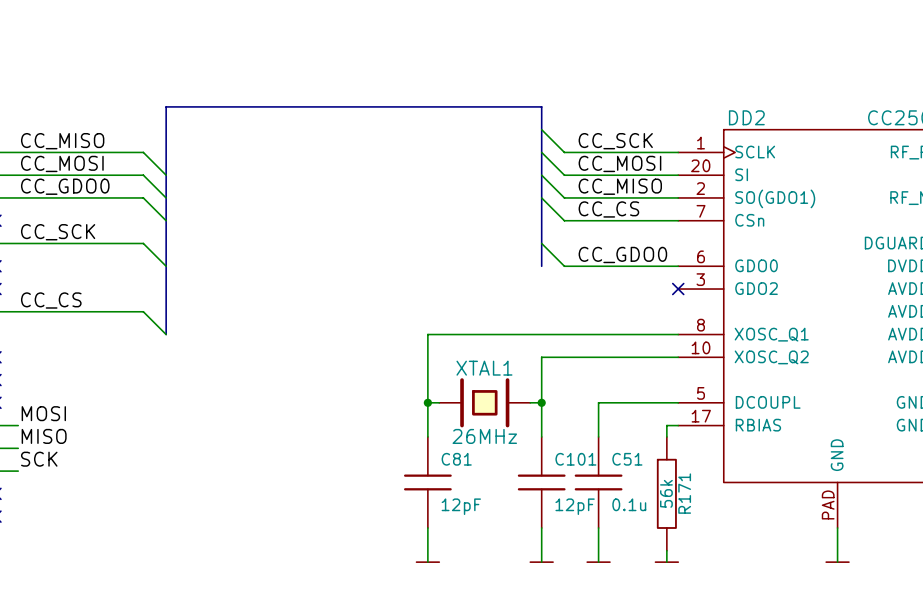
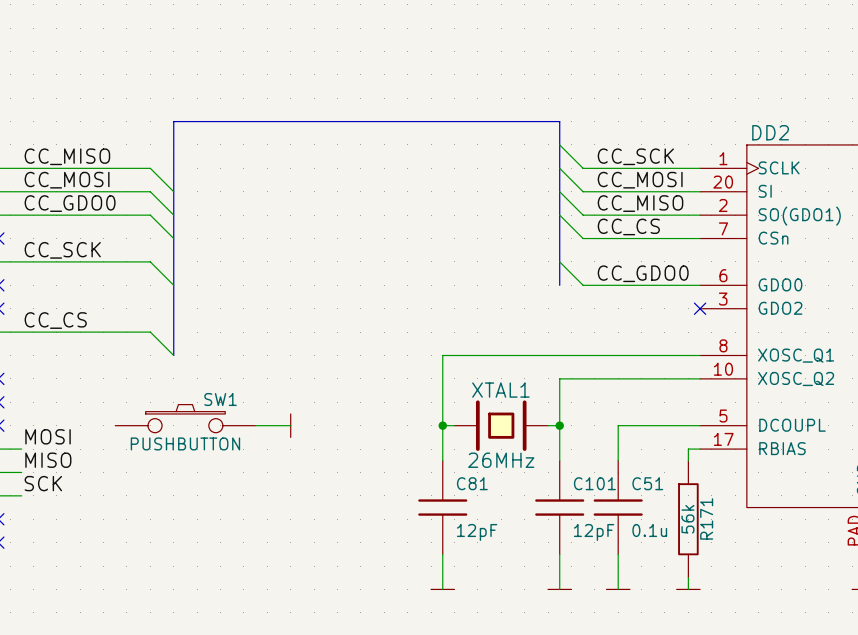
SW1: none -> PUSHBUTTON (185, 418)
wire: none -> (255, 425) (290, 425)
power symbol: none -> (290, 425)

